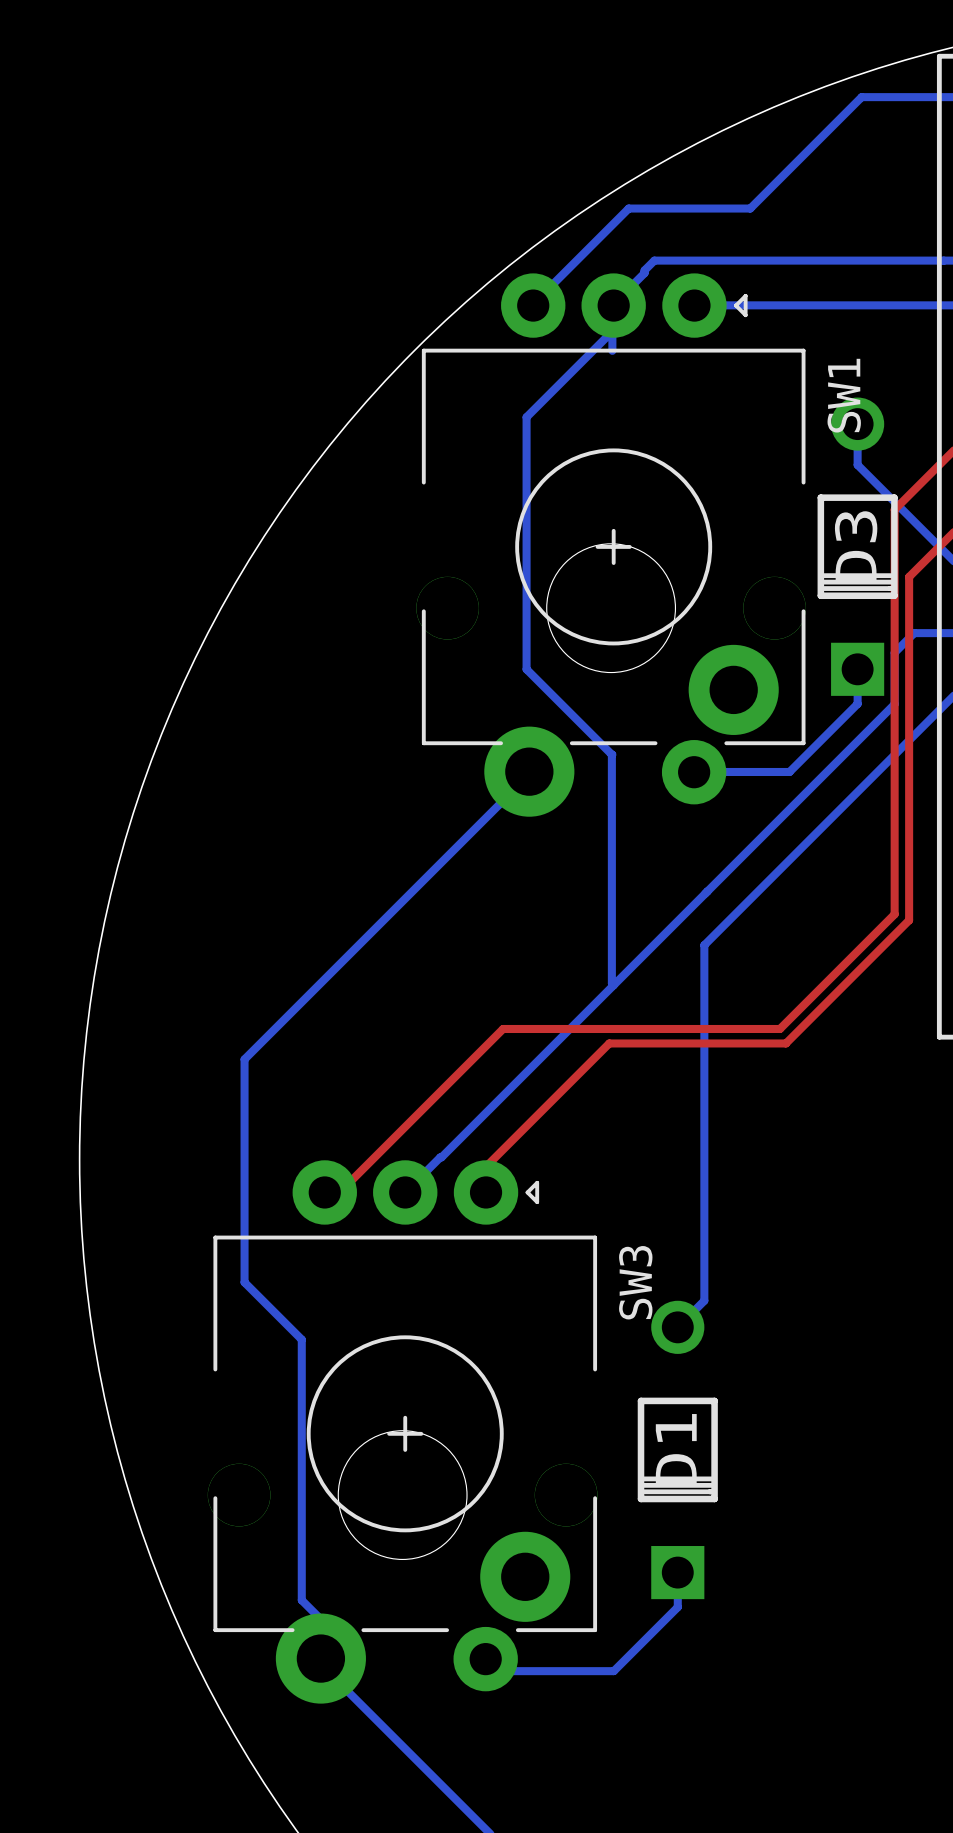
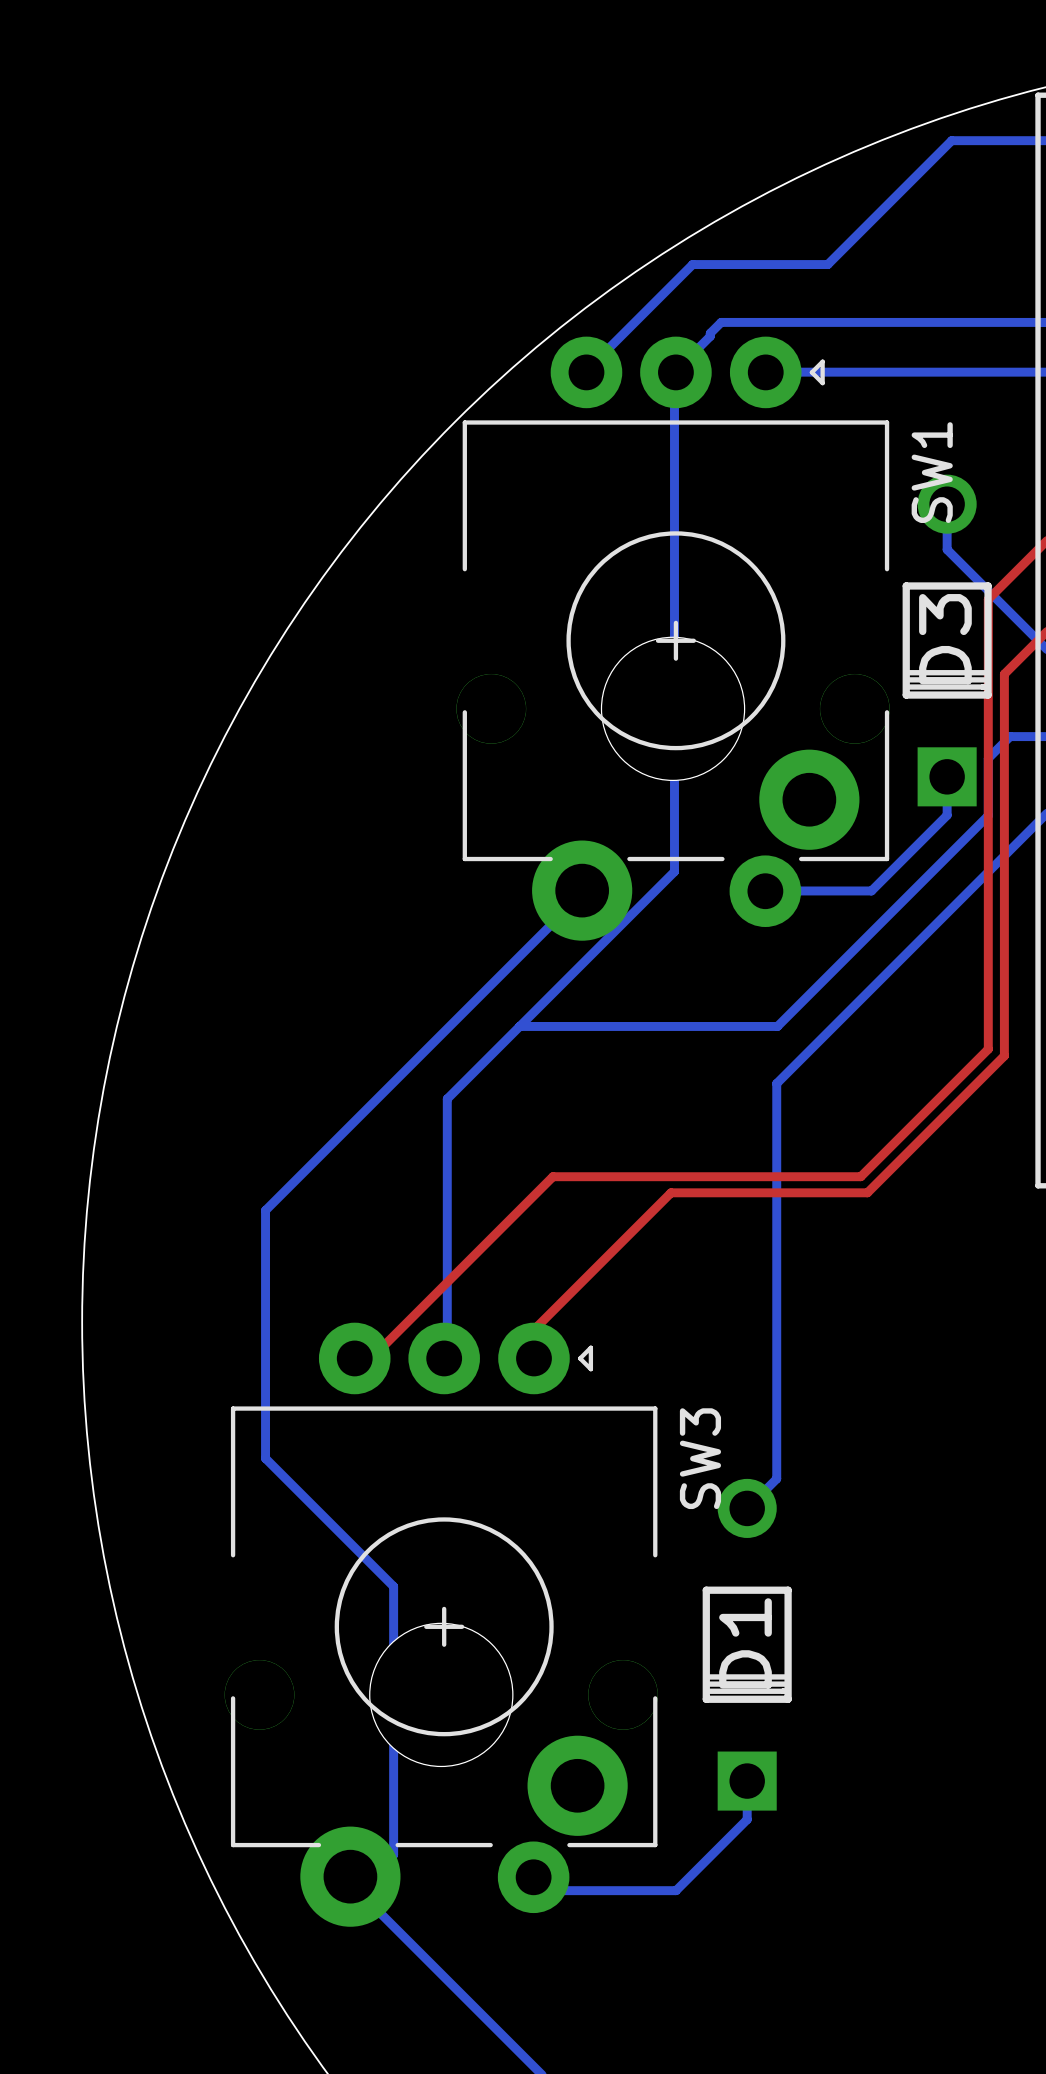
bottom track: (613, 330) (526, 417) (526, 669) (611, 754) (611, 983) (613, 985) -> none
bottom track: none -> (674, 422) (674, 871) (447, 1098) (447, 1371)
bottom track: (705, 893) (405, 1192) -> (777, 1026) (519, 1026)
bottom track: (301, 1339) (301, 1600) (320, 1619) (320, 1683) -> (329, 1522) (393, 1586) (393, 1854) (357, 1890)

